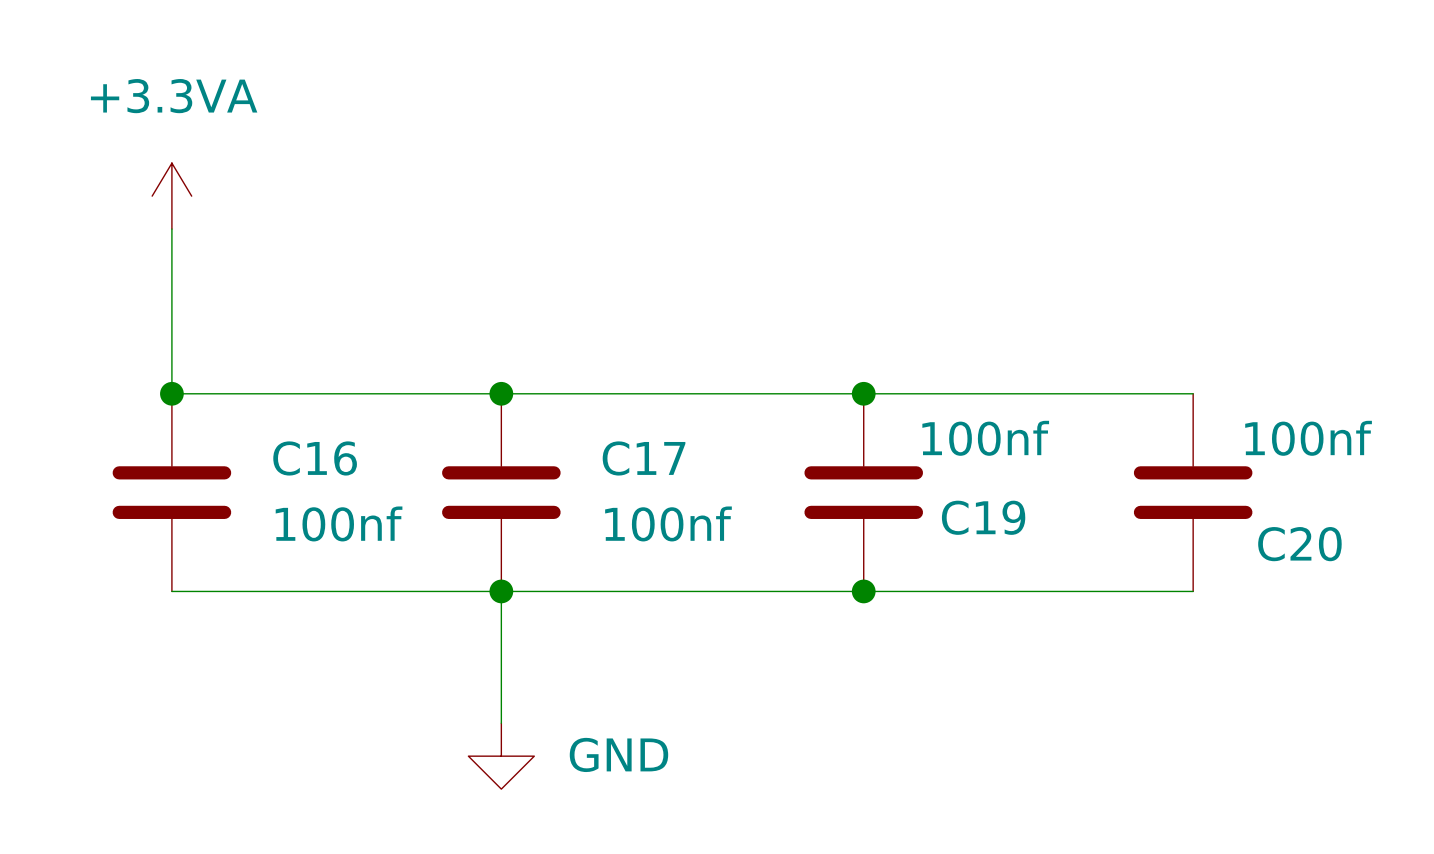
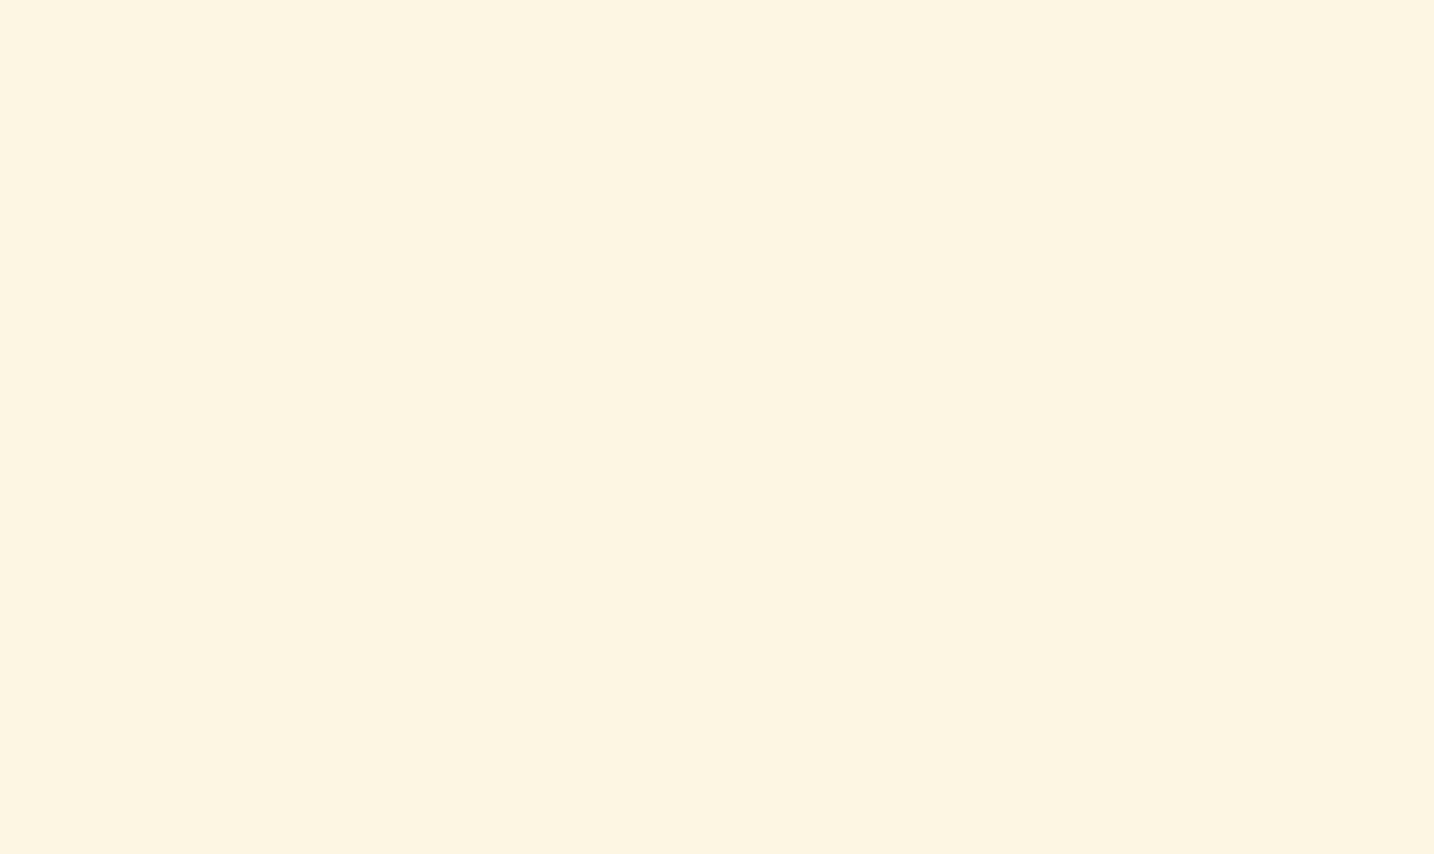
power symbol: +3.3VA (171, 196) -> none
wire: (171, 229) (171, 393) (1193, 393) -> none
junction: (171, 393) -> none
junction: (501, 393) -> none
junction: (863, 393) -> none
C16: 100nf (171, 492) -> none
C17: 100nf (501, 492) -> none
C19: 100nf (863, 492) -> none
C20: 100nf (1193, 492) -> none
wire: (171, 591) (1193, 591) -> none
wire: (501, 591) (501, 723) -> none
junction: (501, 591) -> none
junction: (863, 591) -> none
power symbol: GND (501, 756) -> none

